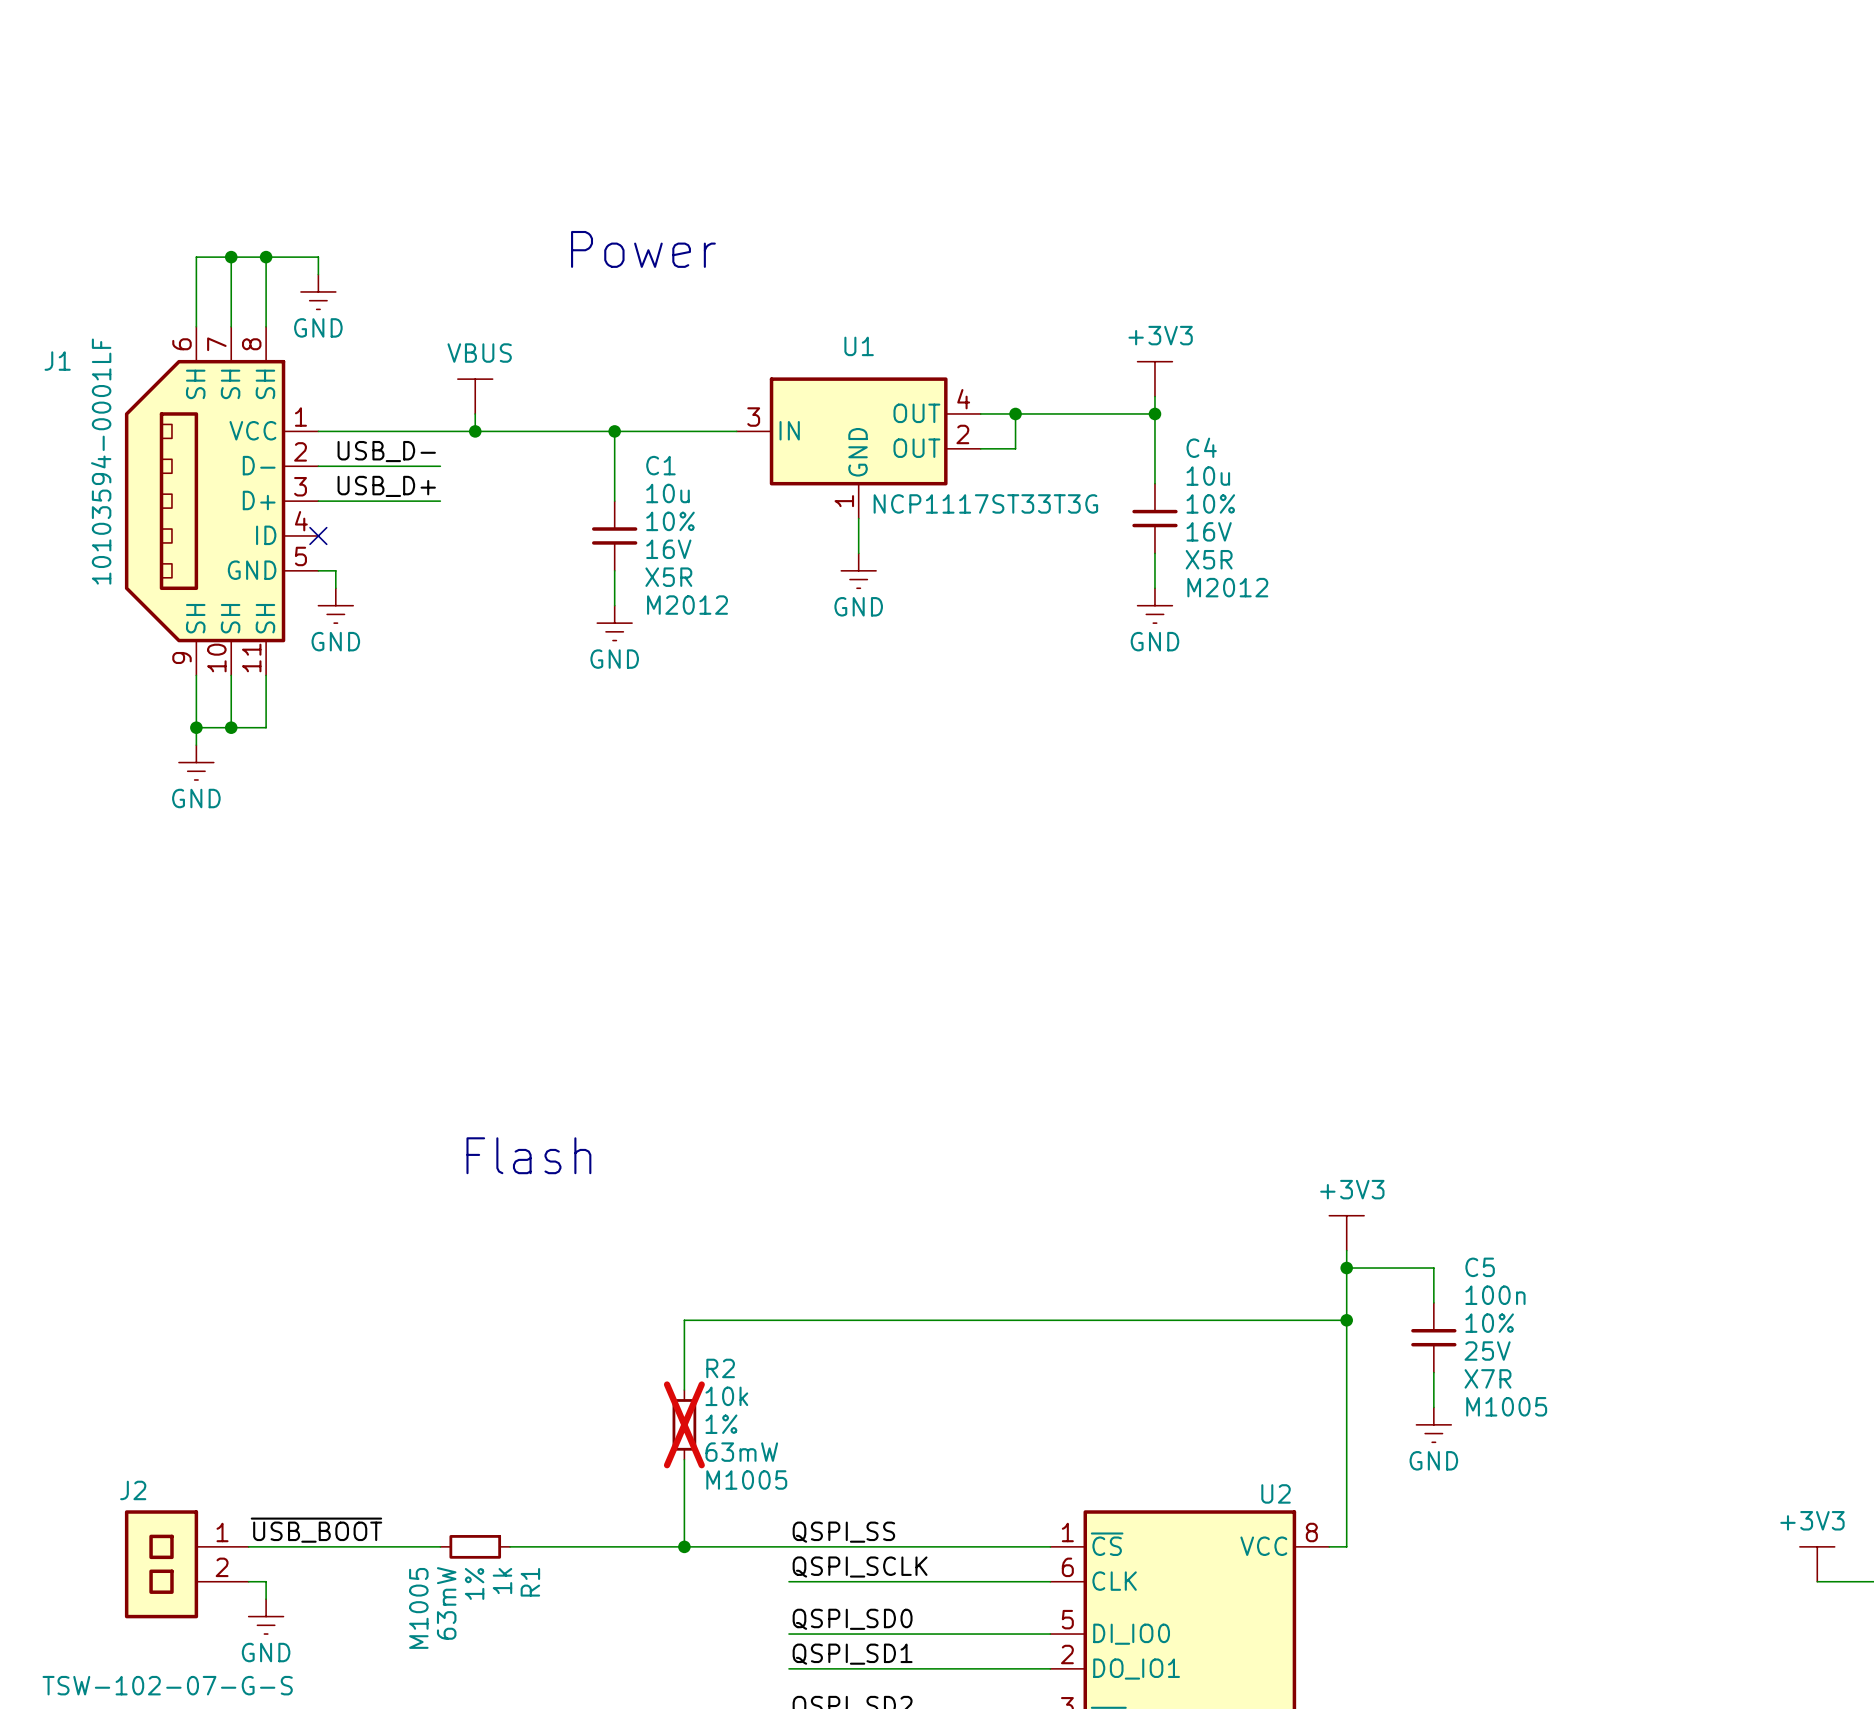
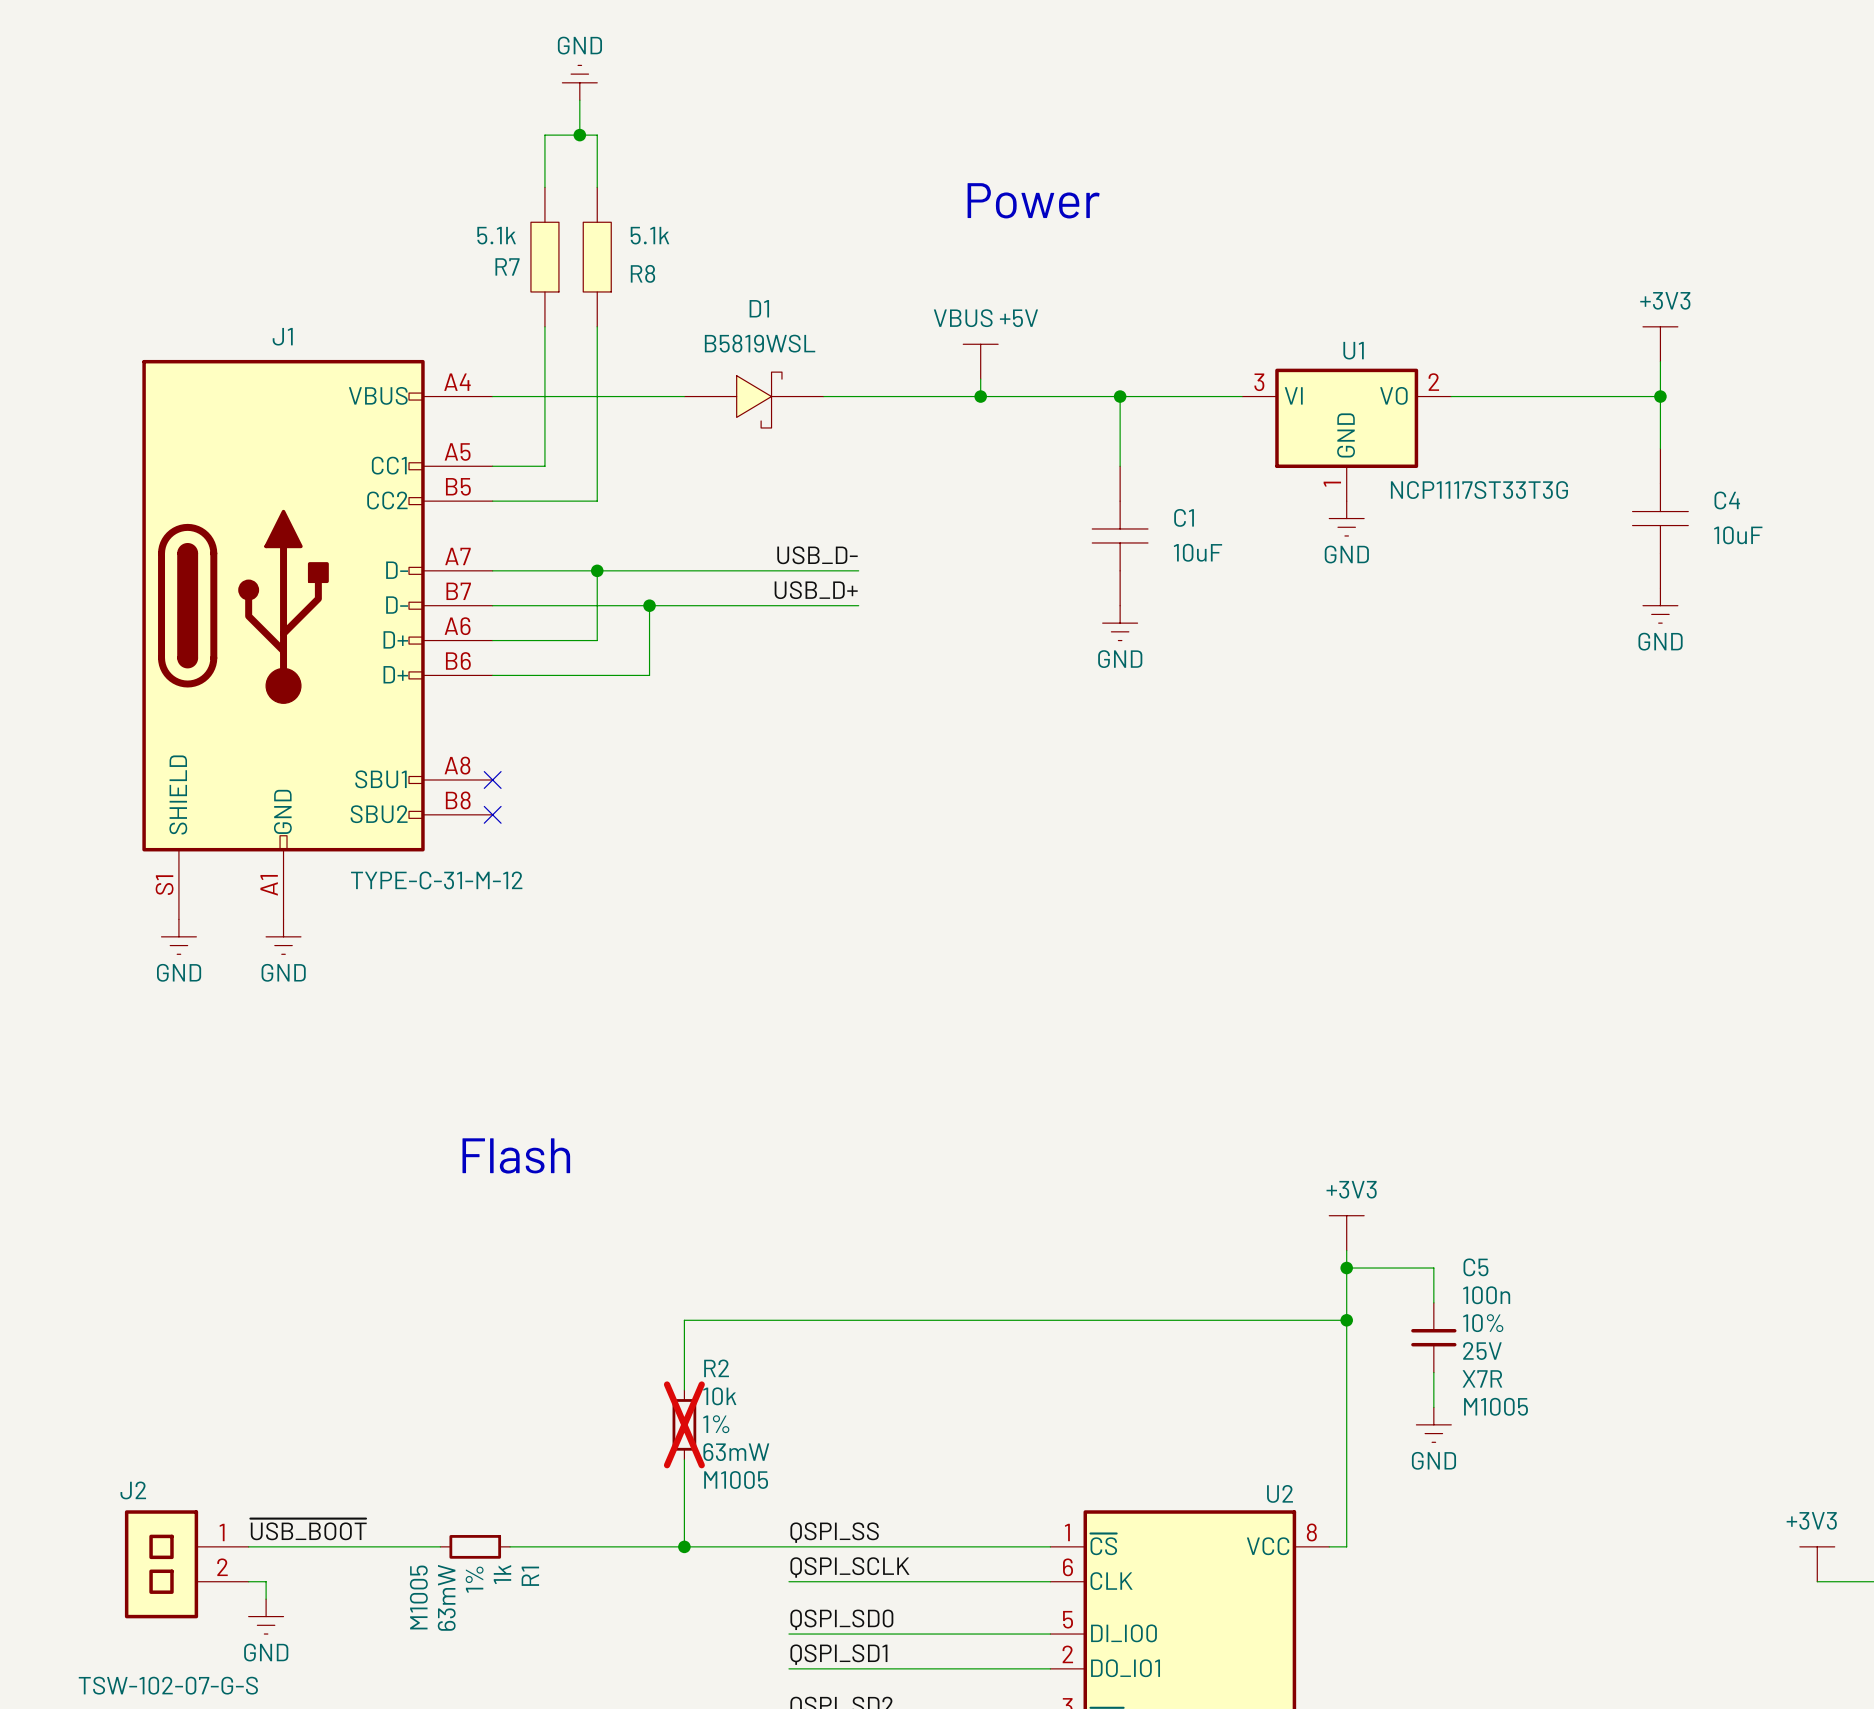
power symbol: none -> GND (579, 82)
wire: none -> (579, 100) (579, 135)
junction: none -> (579, 135)
wire: none -> (544, 187) (544, 135) (597, 135) (597, 187)
text: none -> Power (1033, 200)
text: Power (643, 249) -> none
wire: (231, 257) (231, 326) -> none
junction: (231, 257) -> none
wire: (266, 257) (266, 326) -> none
junction: (266, 257) -> none
R7: none -> 5.1k (544, 257)
R8: none -> 5.1k (597, 257)
wire: (318, 274) (318, 257) (196, 257) (196, 326) -> none
power symbol: GND (318, 291) -> none
J1 symbol: [124, 326, 319, 676] -> [142, 359, 493, 920]
wire: none -> (544, 326) (544, 466) (492, 466)
wire: none -> (597, 326) (597, 501) (492, 501)
power symbol: none -> +3V3 (1660, 344)
J1 name position: J1 (57, 361) -> J1 (282, 336)
power symbol: none -> VBUS +5V (980, 361)
wire: none -> (1660, 361) (1660, 448)
U1 symbol: [736, 377, 981, 519] -> [1242, 368, 1452, 502]
wire: none -> (980, 379) (980, 396)
power symbol: +3V3 (1154, 379) -> none
power symbol: VBUS (475, 396) -> none
wire: none -> (492, 396) (684, 396)
wire: none -> (823, 396) (1242, 396)
wire: none -> (1120, 396) (1120, 466)
wire: (1154, 396) (1154, 483) -> none
wire: none -> (1451, 396) (1660, 396)
junction: none -> (1660, 396)
D1: none -> B5819WSL (754, 400)
wire: (475, 413) (475, 431) -> none
wire: (980, 413) (1154, 413) -> none
wire: (1015, 413) (1015, 448) (980, 448) -> none
junction position: (1015, 413) -> (980, 396)
junction position: (1154, 413) -> (1120, 396)
wire: (318, 431) (736, 431) -> none
junction: (475, 431) -> none
wire: (614, 431) (614, 501) -> none
junction: (614, 431) -> none
C4 name position: C4 (1201, 447) -> C4 (1727, 500)
label: USB_D- (386, 451) -> none
J1 value: 10103594-0001LF (101, 461) -> TYPE-C-31-M-12 (436, 880)
C1 name position: C1 (660, 465) -> C1 (1184, 517)
C4 value: 10u (1208, 476) -> 10uF (1738, 535)
C4 symbol: [1132, 483, 1178, 554] -> [1632, 448, 1689, 589]
label: USB_D+ (386, 486) -> none
C1 value: 10u (668, 493) -> 10uF (1197, 552)
C1 symbol: [592, 501, 638, 571] -> [1092, 466, 1148, 606]
C4 text: 10% (1210, 503) -> none
wire: (858, 518) (858, 553) -> none
power symbol: none -> GND (1346, 518)
C1 text: 10% (670, 521) -> none
C4 text: 16V (1209, 531) -> none
no-connect mark: (318, 535) -> none
C1 text: 16V (668, 549) -> none
wire: (1154, 553) (1154, 588) -> none
label: none -> USB_D- (817, 555)
C4 text: X5R (1209, 559) -> none
wire: none -> (492, 570) (858, 570)
wire: none -> (597, 570) (597, 640) (492, 640)
junction: none -> (597, 570)
wire: (614, 570) (614, 605) -> none
power symbol: GND (858, 570) -> none
C1 text: X5R (668, 577) -> none
C4 text: M2012 (1227, 587) -> none
label: none -> USB_D+ (816, 590)
power symbol: GND (335, 605) -> none
wire: none -> (492, 605) (858, 605)
wire: none -> (649, 605) (649, 675) (492, 675)
junction: none -> (649, 605)
C1 text: M2012 (687, 605) -> none
power symbol position: GND (1154, 605) -> GND (1120, 623)
power symbol: none -> GND (1660, 605)
power symbol: GND (614, 623) -> none
junction: (196, 727) -> none
junction: (231, 727) -> none
power symbol: GND (196, 762) -> none
no-connect mark: none -> (492, 779)
no-connect mark: none -> (492, 814)
power symbol: none -> GND (178, 936)
power symbol: none -> GND (283, 936)

